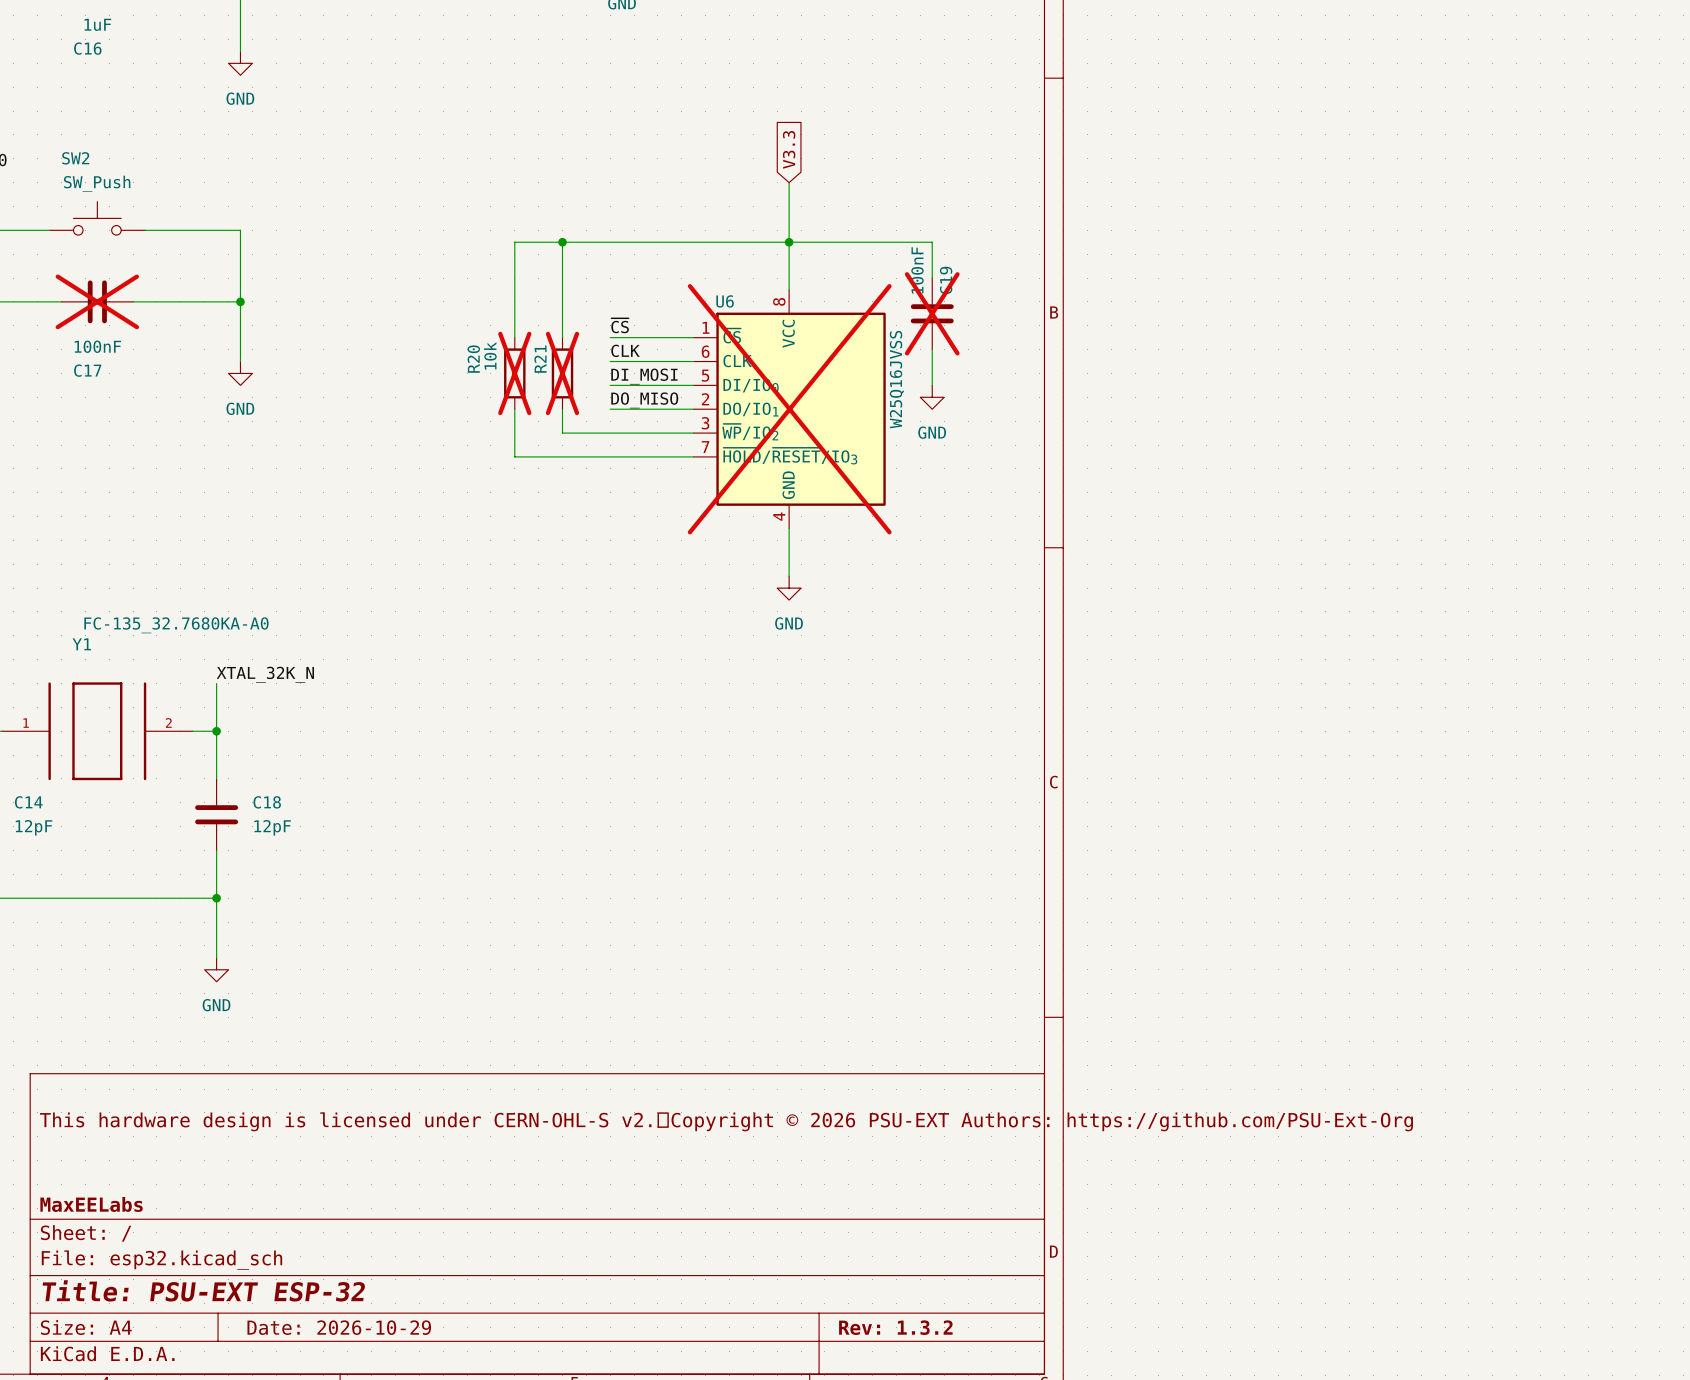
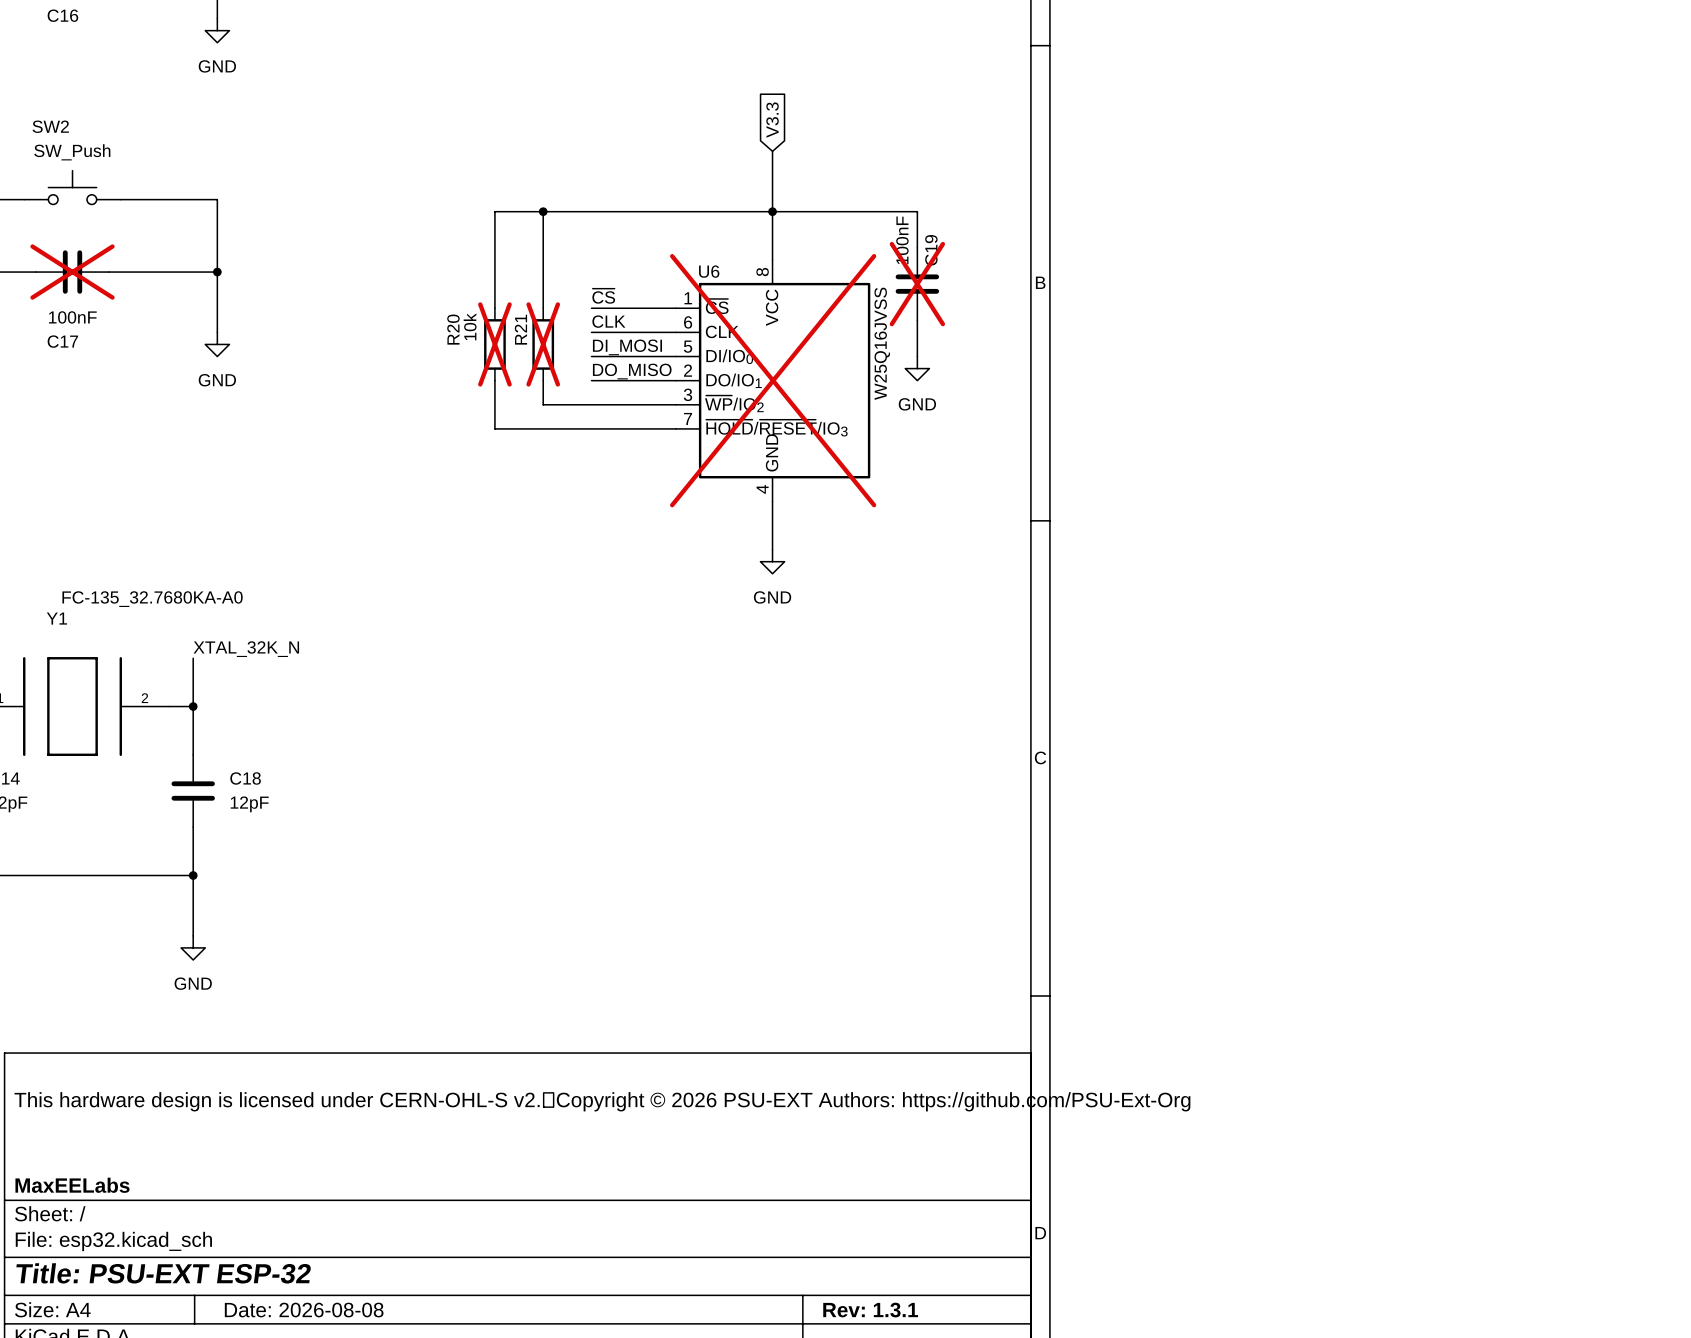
title block: Date: 2026-10-29 (339, 1327) -> Date: 2026-08-08 (304, 1310)
title block: Rev: 1.3.2 (895, 1327) -> Rev: 1.3.1 (870, 1310)

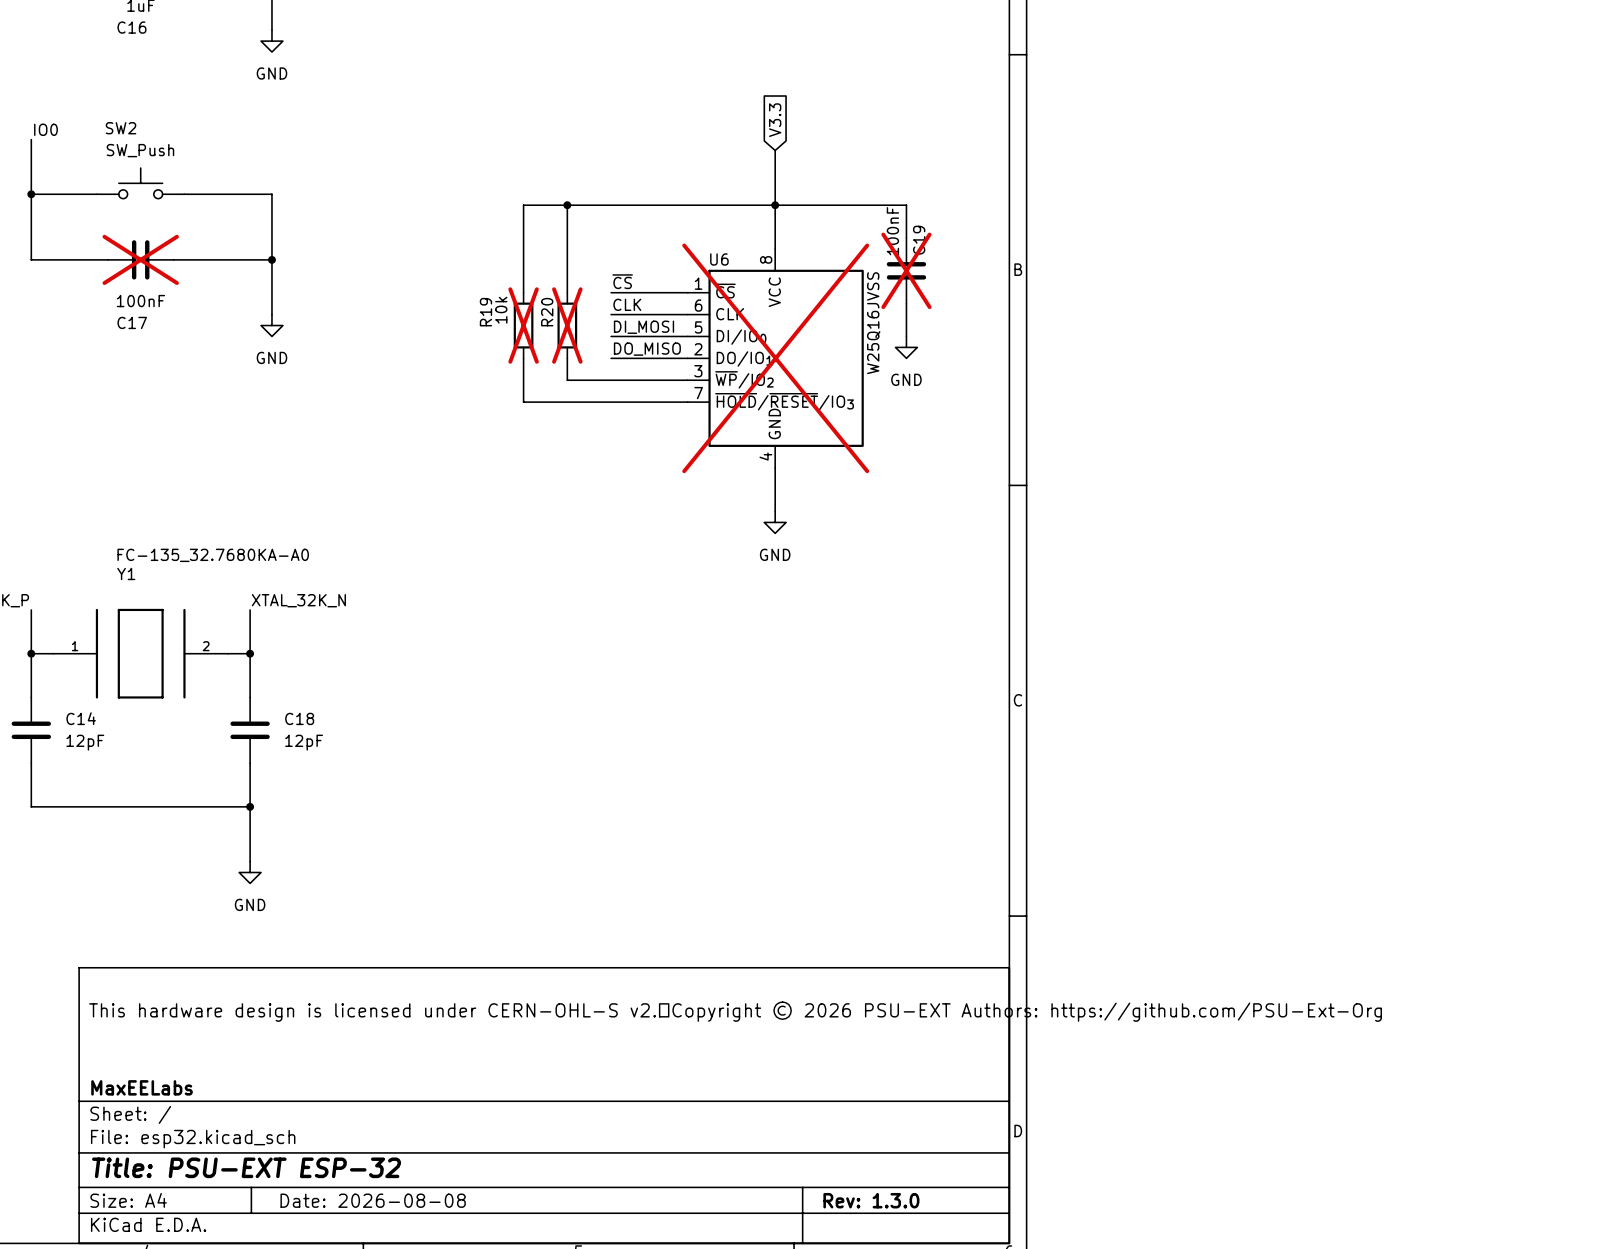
R20 name: R20 (453, 329) -> R19 (485, 312)
R21 name: R21 (520, 329) -> R20 (547, 312)
title block: Rev: 1.3.1 (870, 1310) -> Rev: 1.3.0 (871, 1200)

